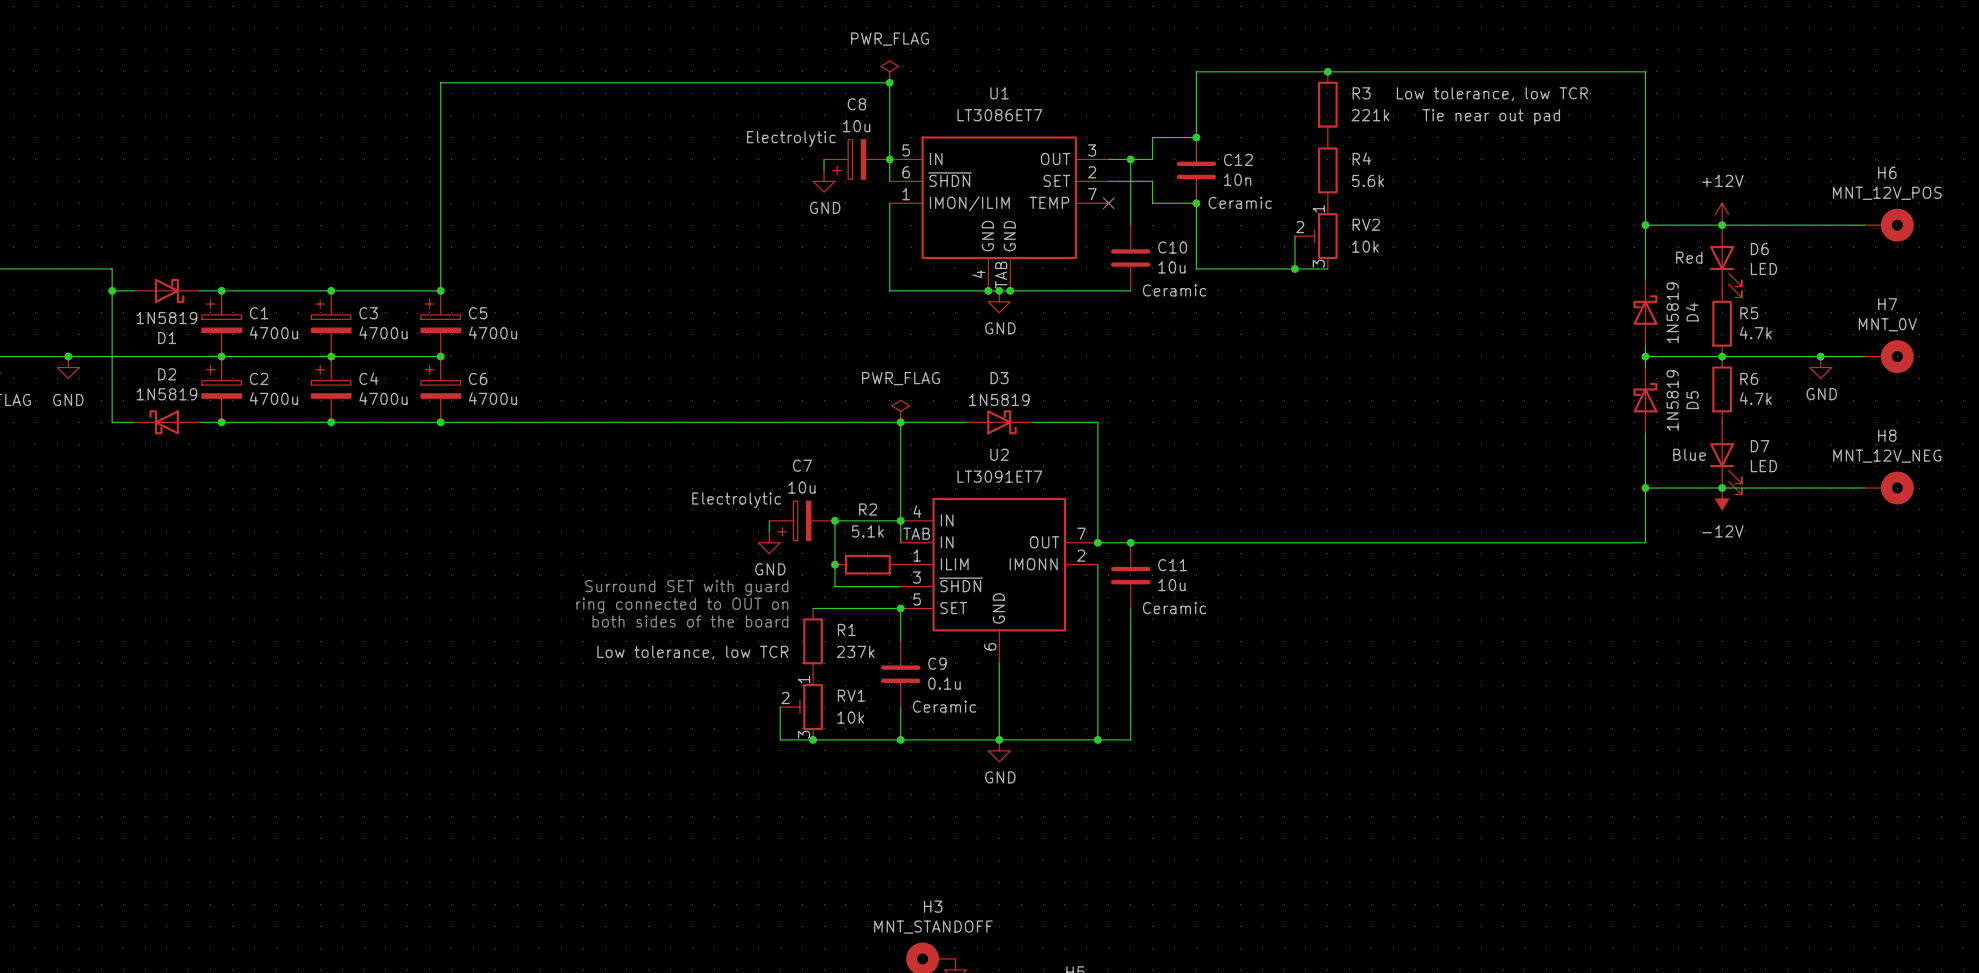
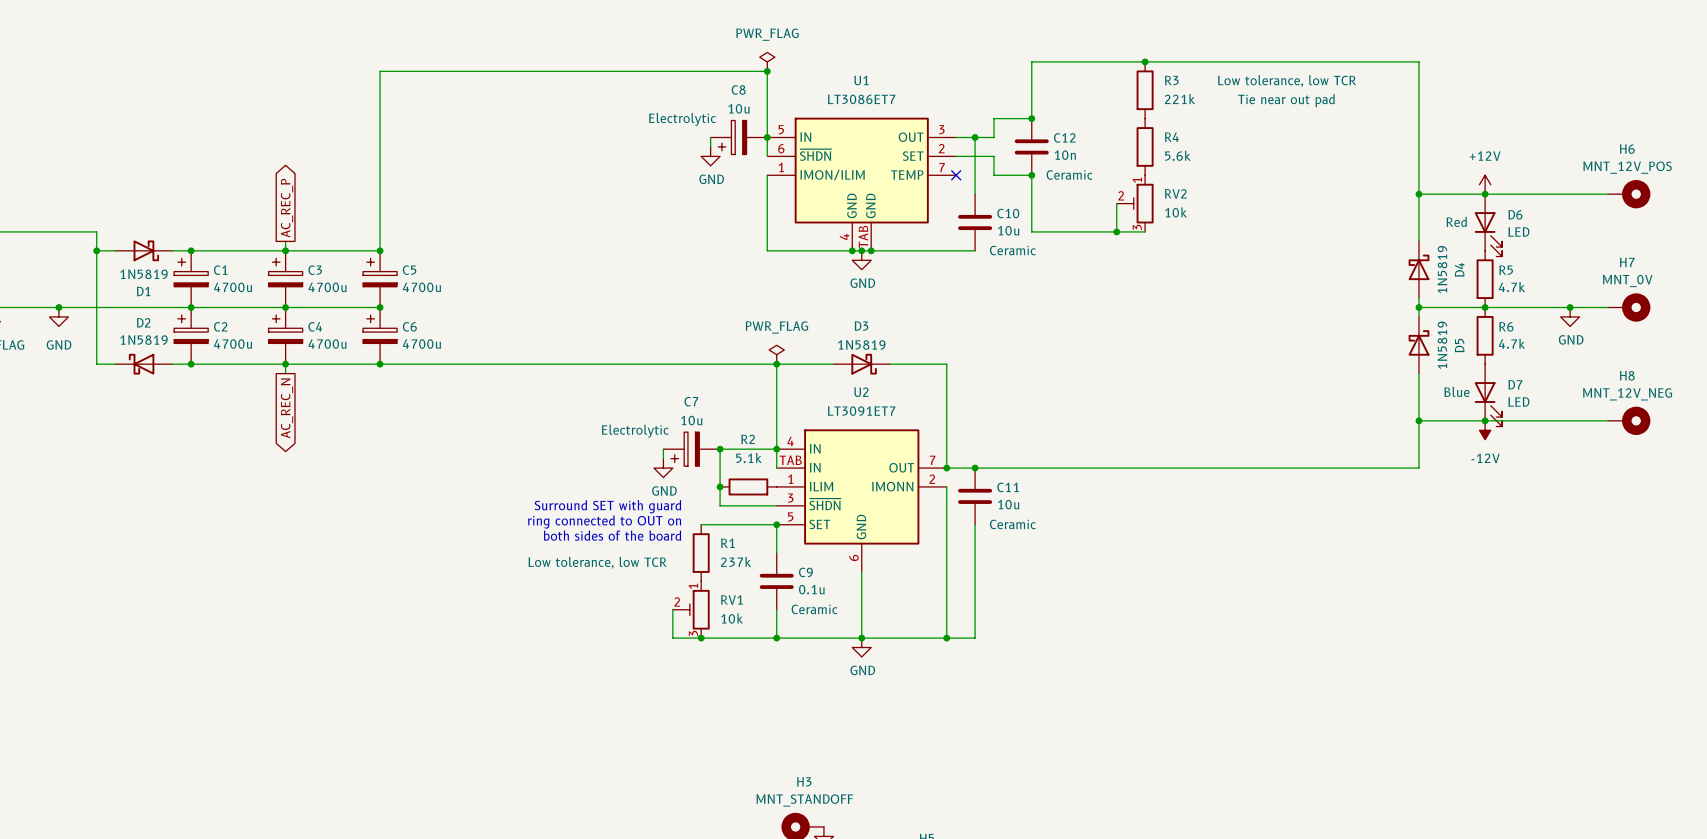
global label: none -> AC_REC_P (287, 208)
wire: none -> (285, 241) (285, 250)
wire: none -> (285, 364) (285, 373)
global label: none -> AC_REC_N (287, 408)

